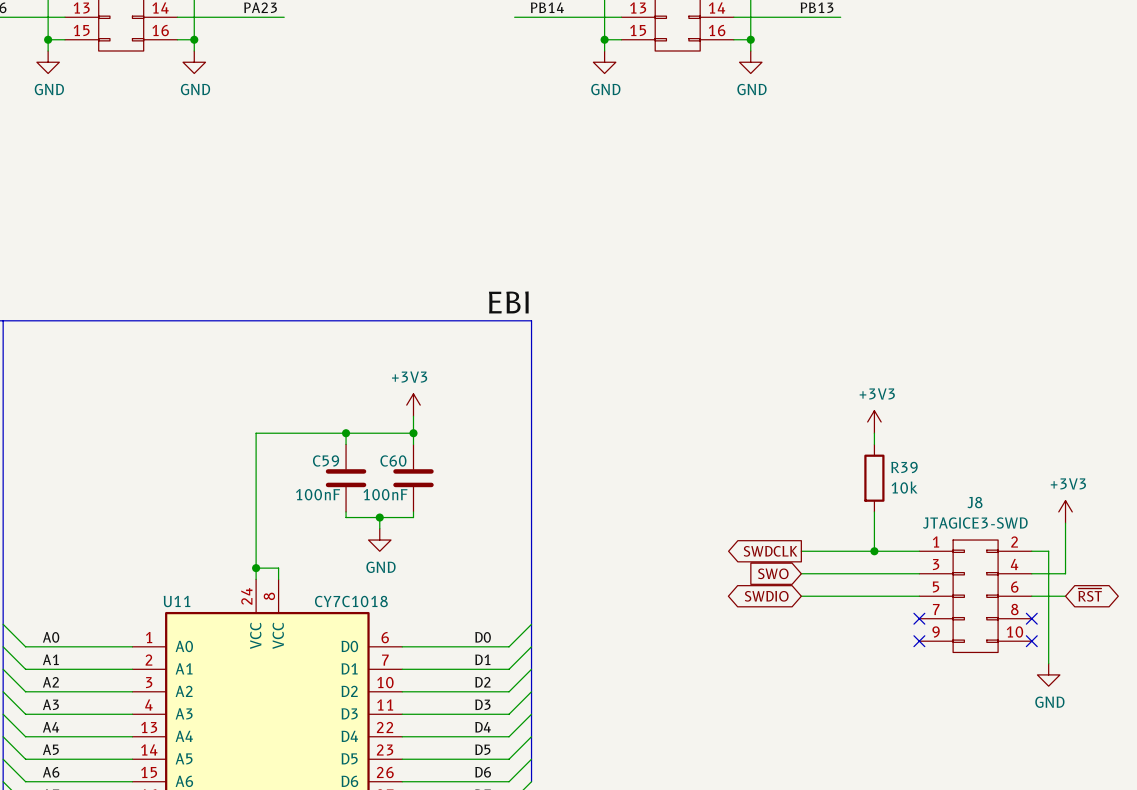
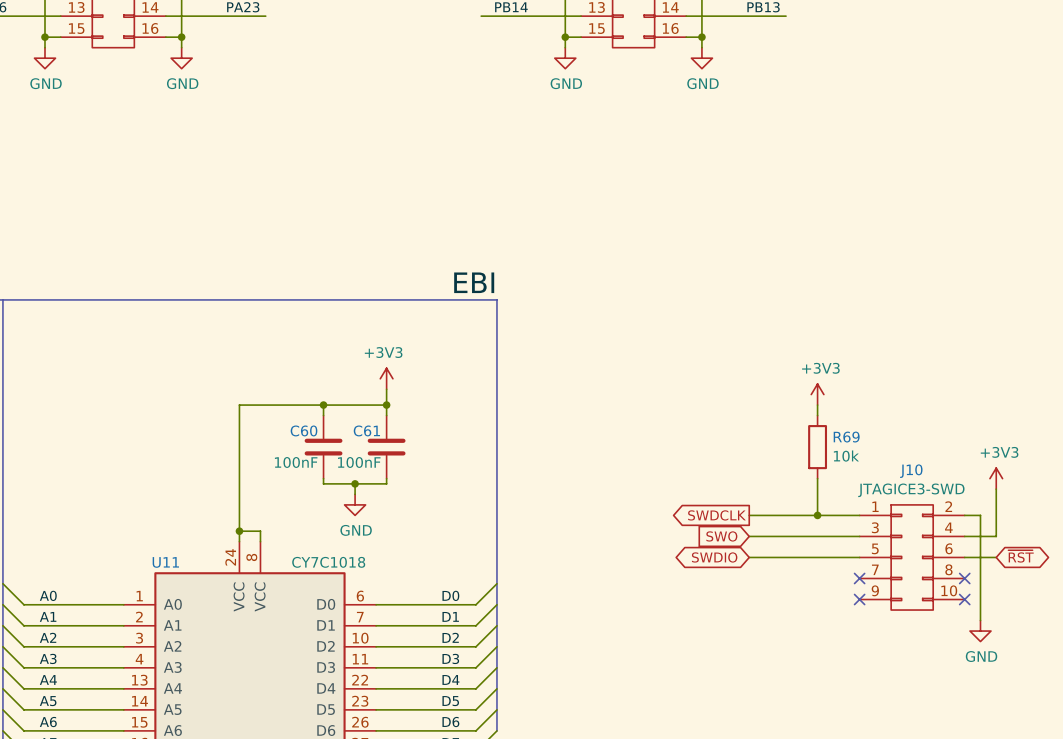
C59 name: C59 (326, 460) -> C60 (304, 430)
C60 name: C60 (393, 460) -> C61 (366, 430)
R39 name: R39 (904, 467) -> R69 (846, 437)
J8 name: J8 (974, 502) -> J10 (911, 471)

